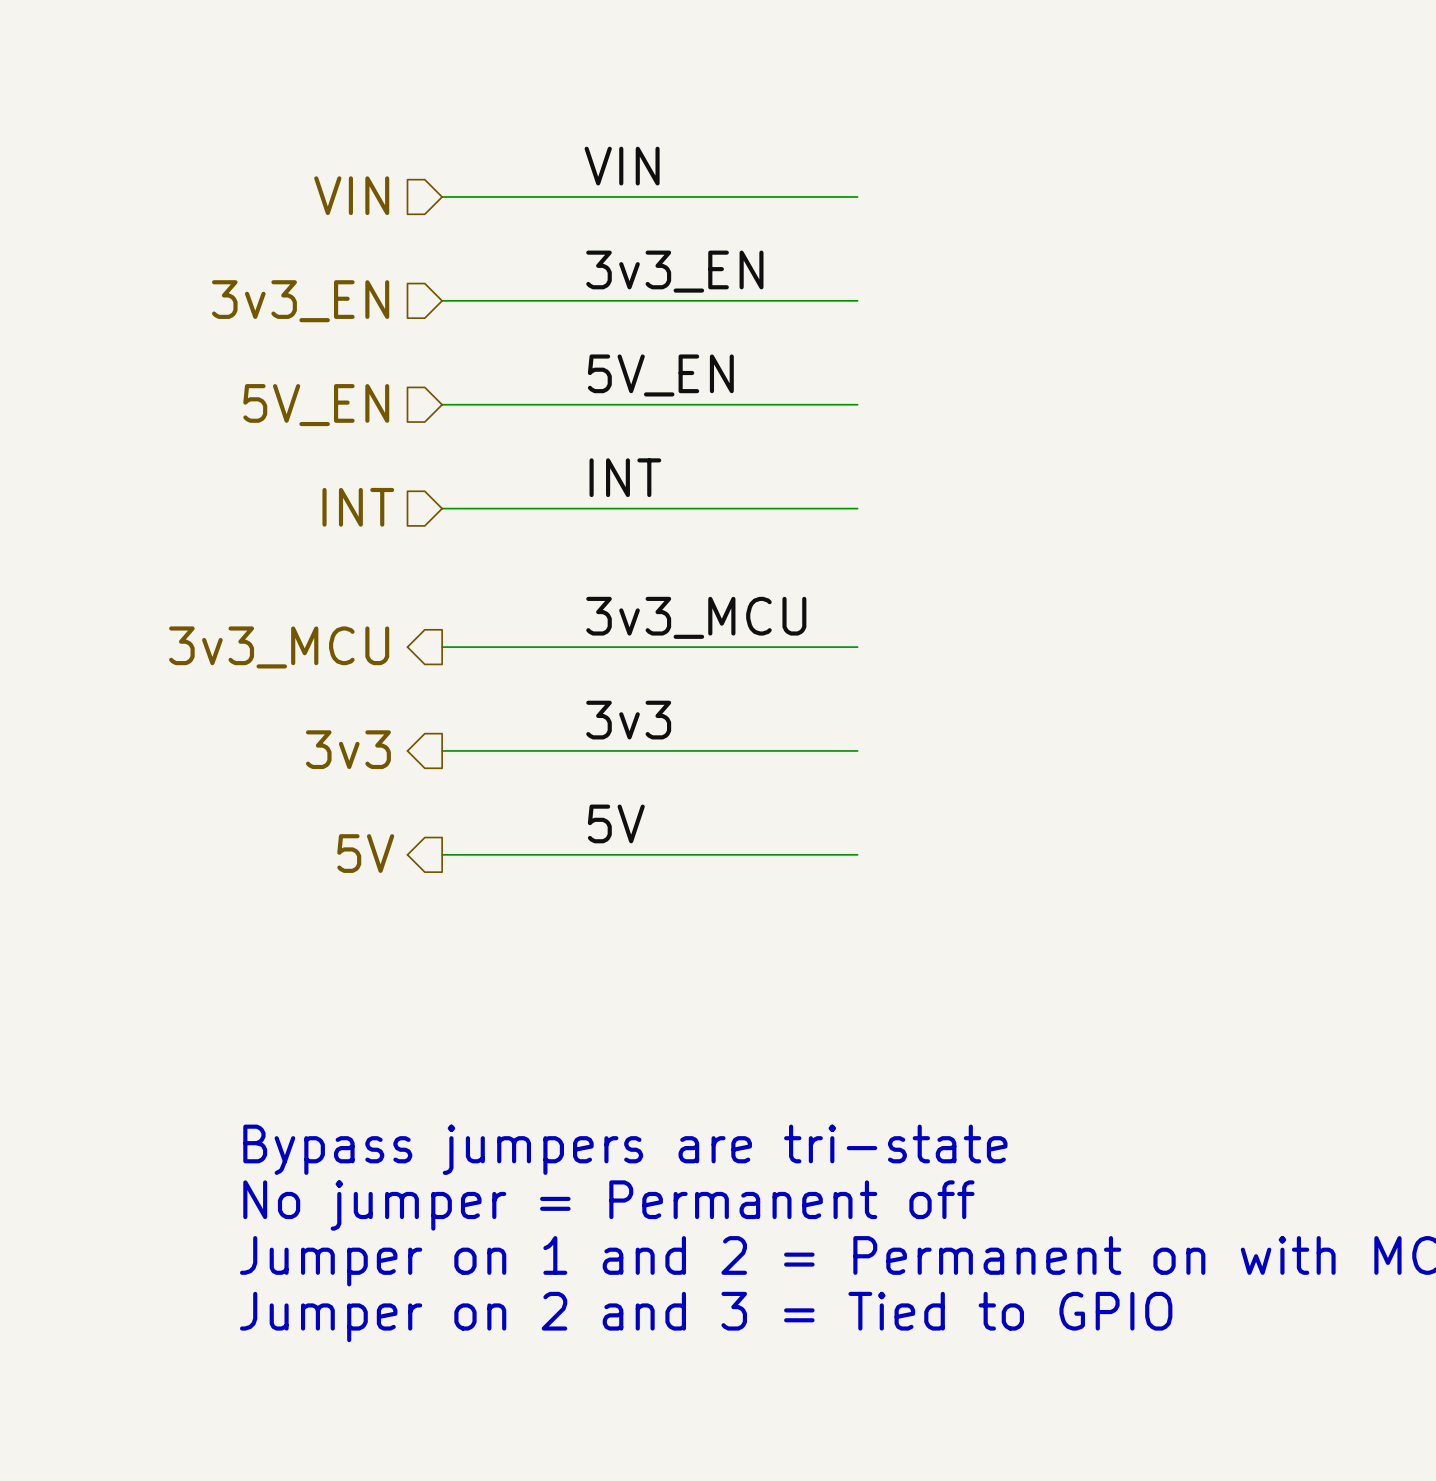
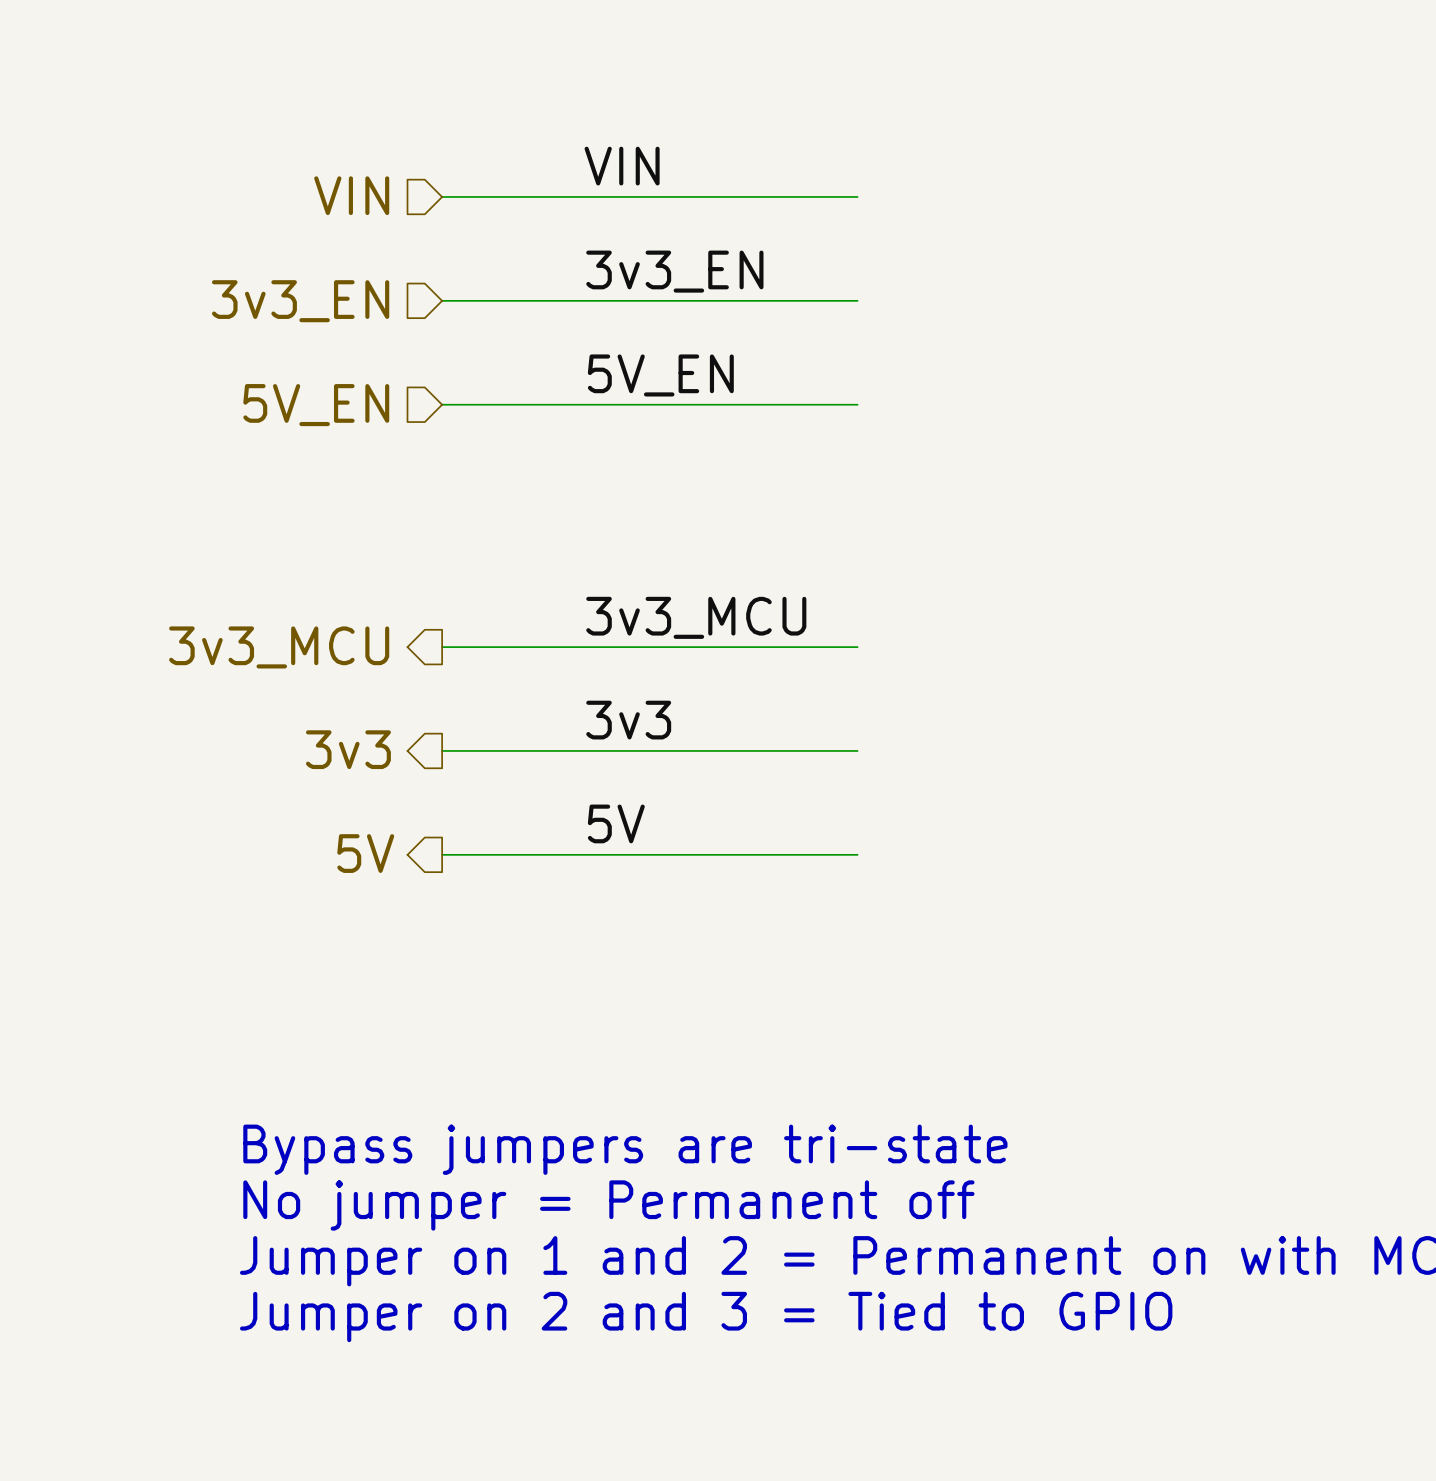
label: INT (625, 477) -> none
hierarchical label: INT (358, 507) -> none
wire: (442, 508) (857, 508) -> none

